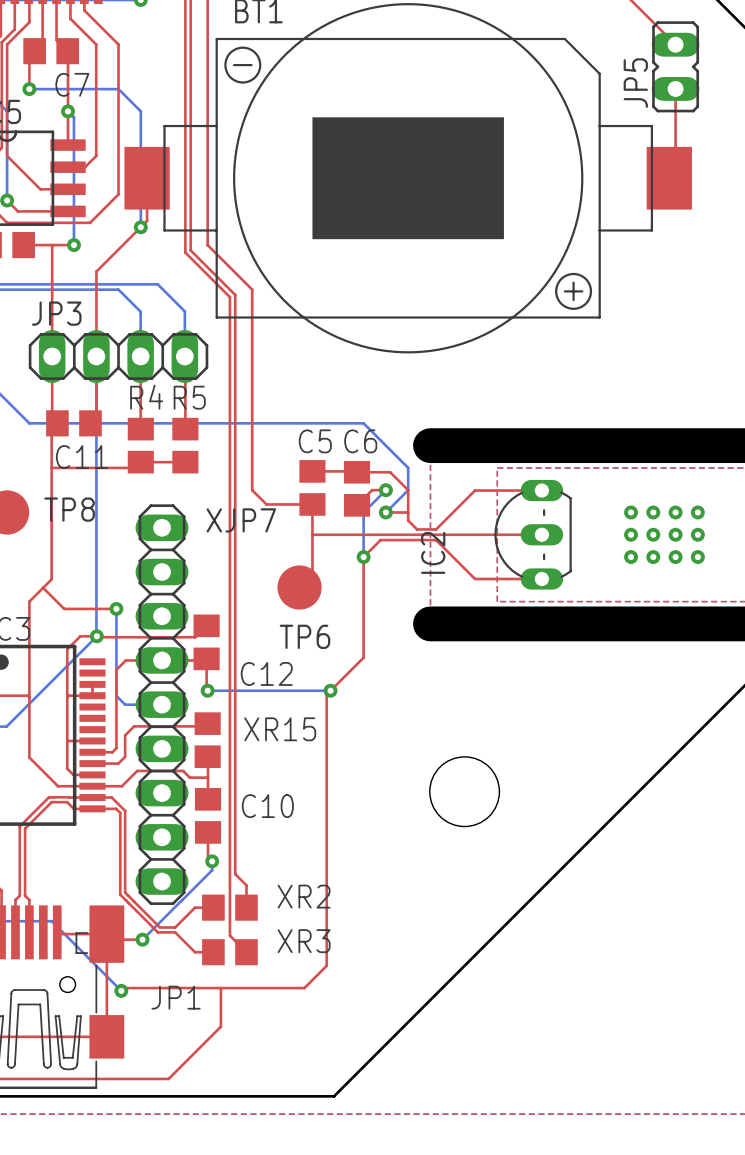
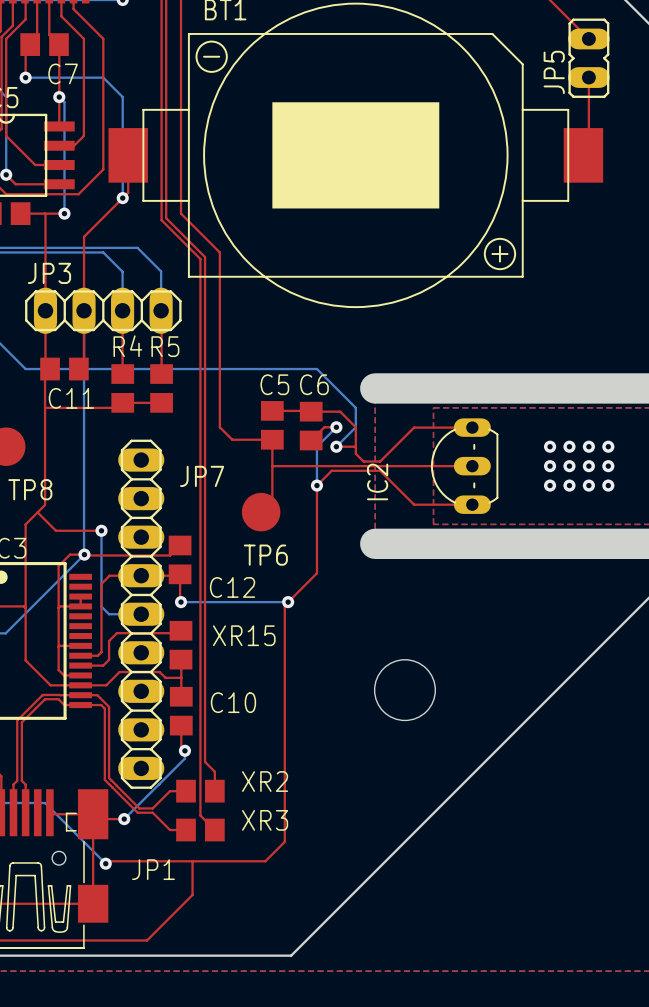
TP8 name position: TP8 (69, 509) -> TP8 (30, 489)
XJP7 name: XJP7 (241, 520) -> JP7 (202, 476)

